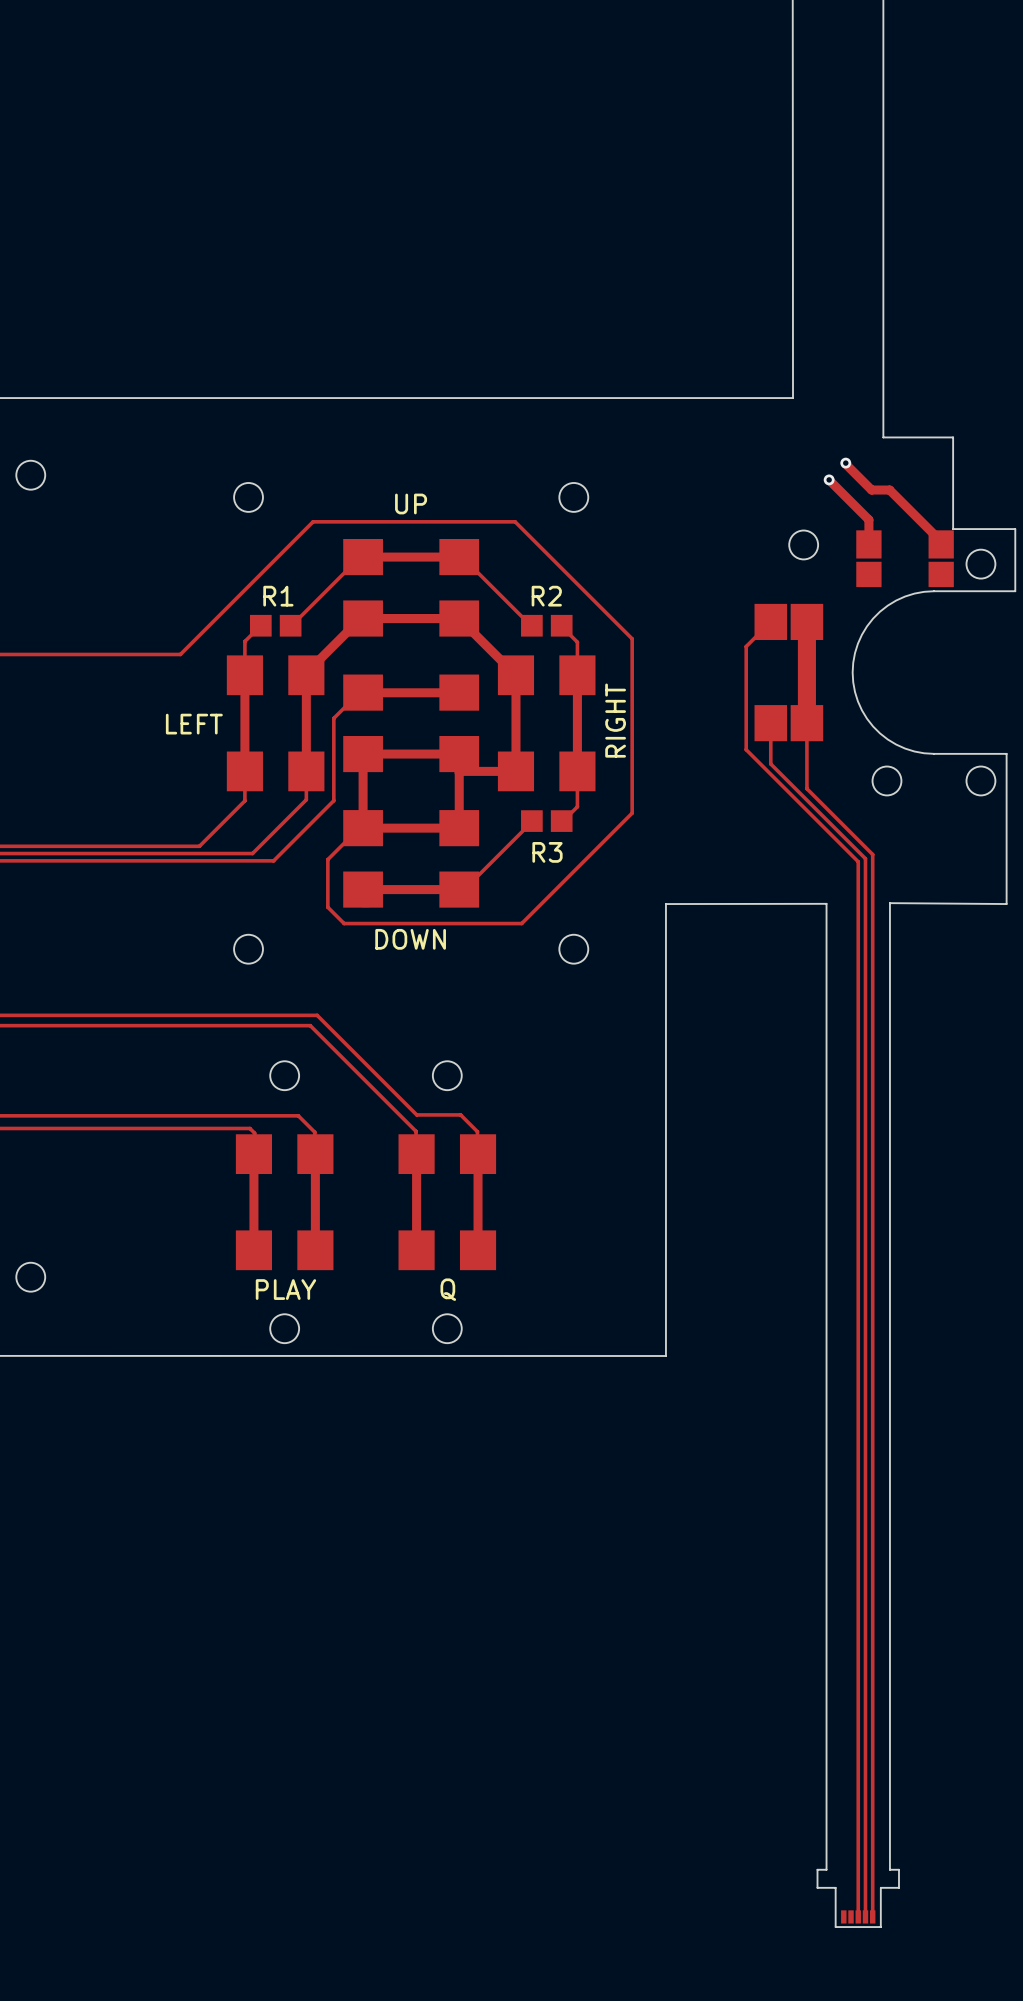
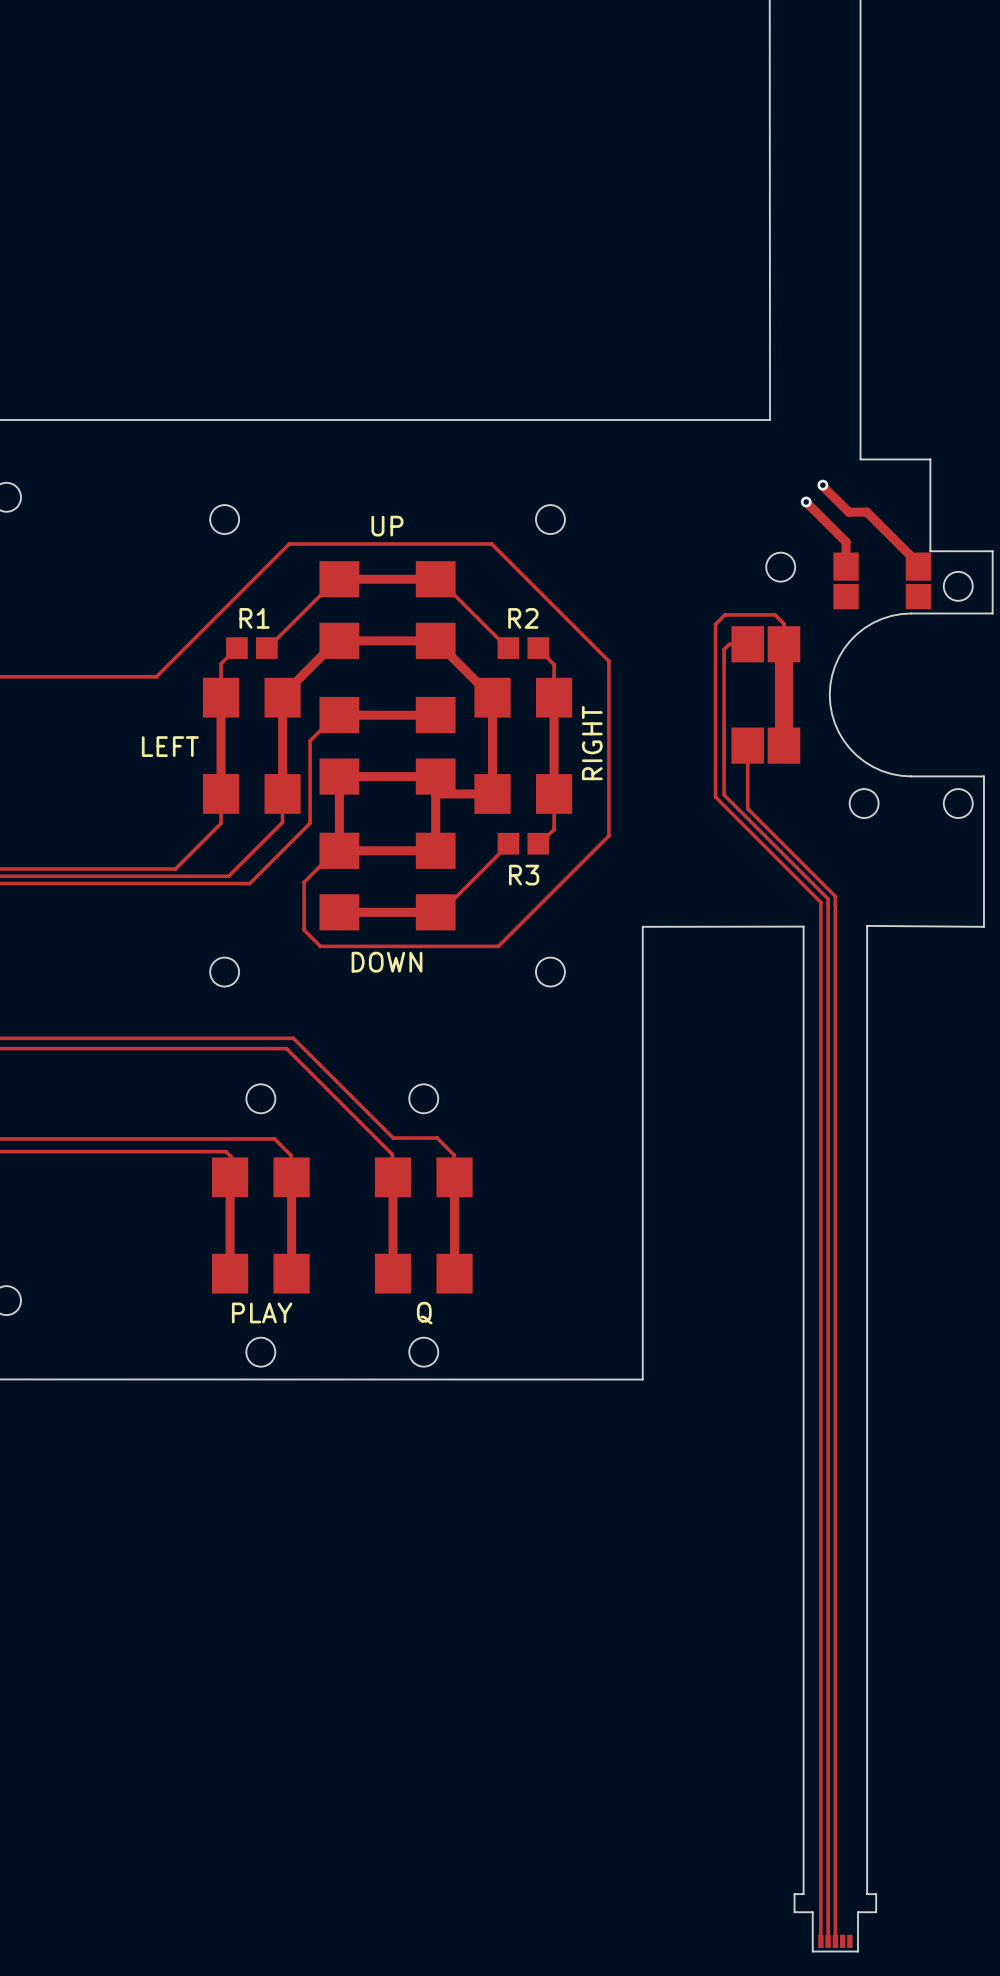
track: (770, 621) (746, 646) (746, 749) (858, 861) (858, 873) -> (747, 786) (747, 808) (835, 896)
track: none -> (747, 644) (729, 644) (724, 649) (724, 794) (828, 898) (828, 1941)
track: none -> (783, 644) (783, 623) (775, 614) (724, 614) (715, 624) (715, 797) (820, 902) (820, 1941)
track: (806, 723) (806, 788) (872, 854) (872, 1916) -> none
track: (770, 763) (865, 858) (865, 1916) -> none

